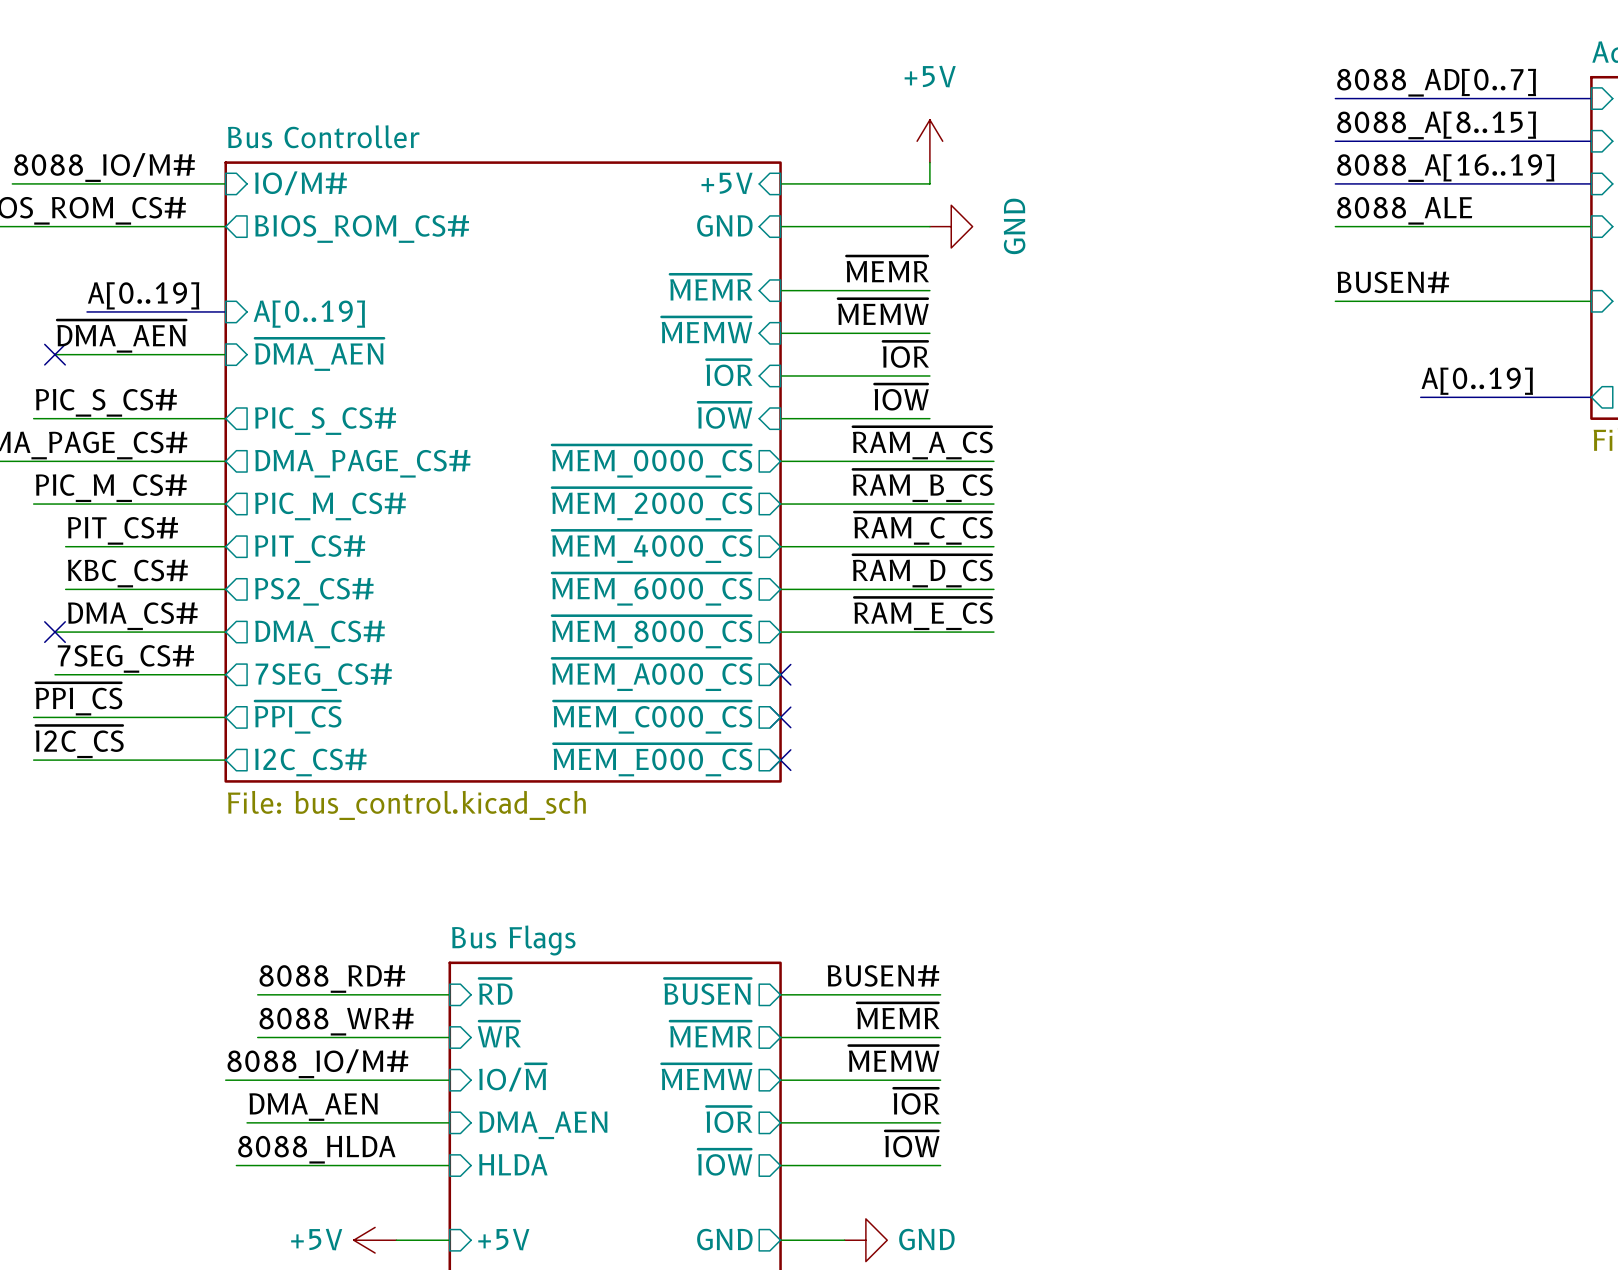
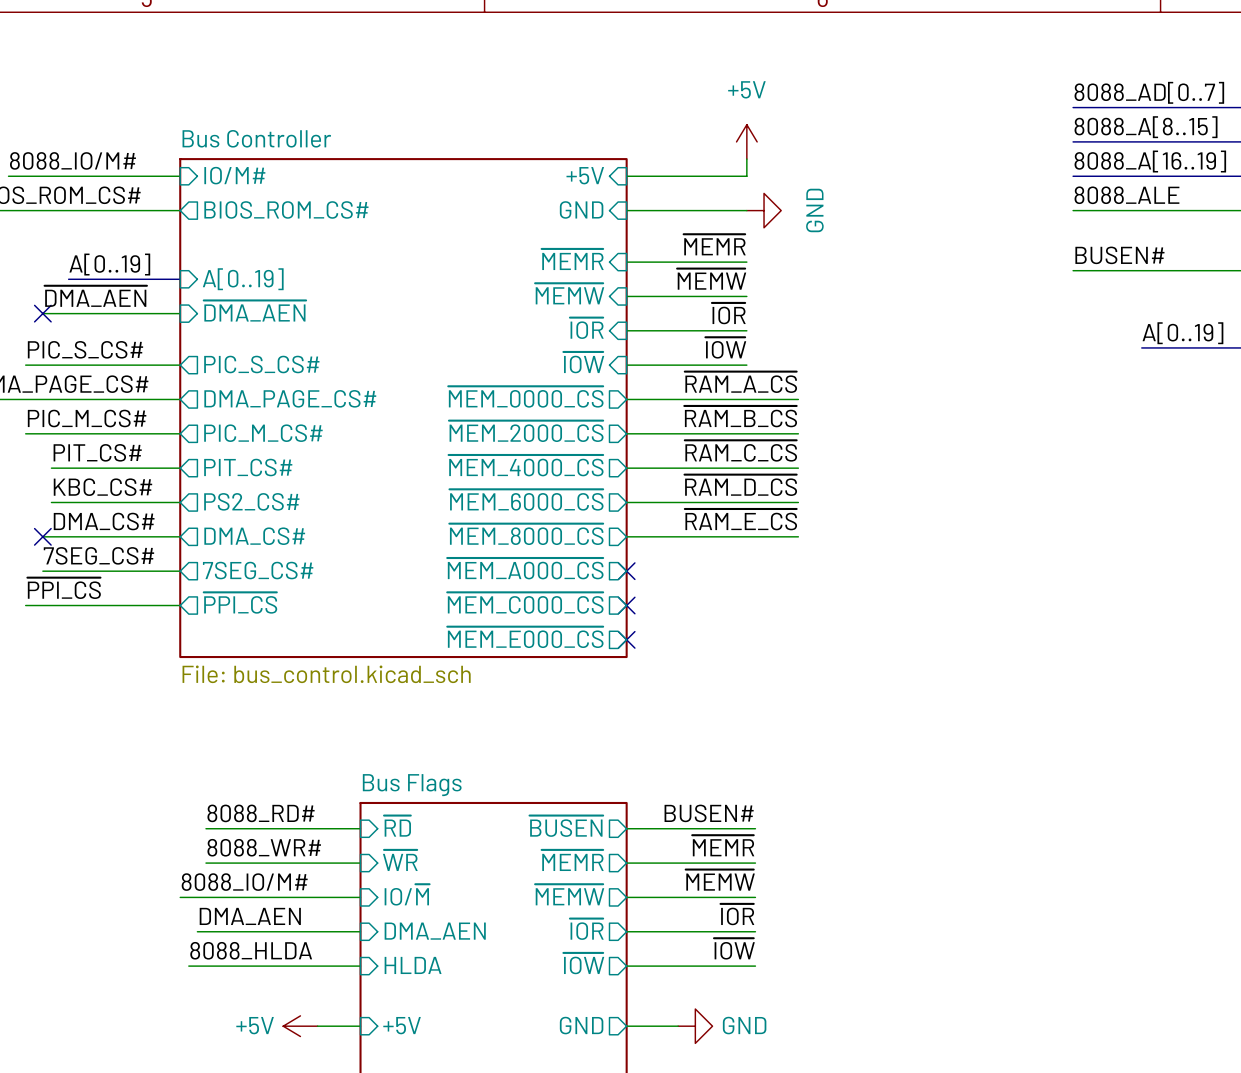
label: ~{I2C_CS} (79, 741) -> none
wire: (33, 760) (225, 760) -> none
sheet pin: I2C_CS# (310, 762) -> none

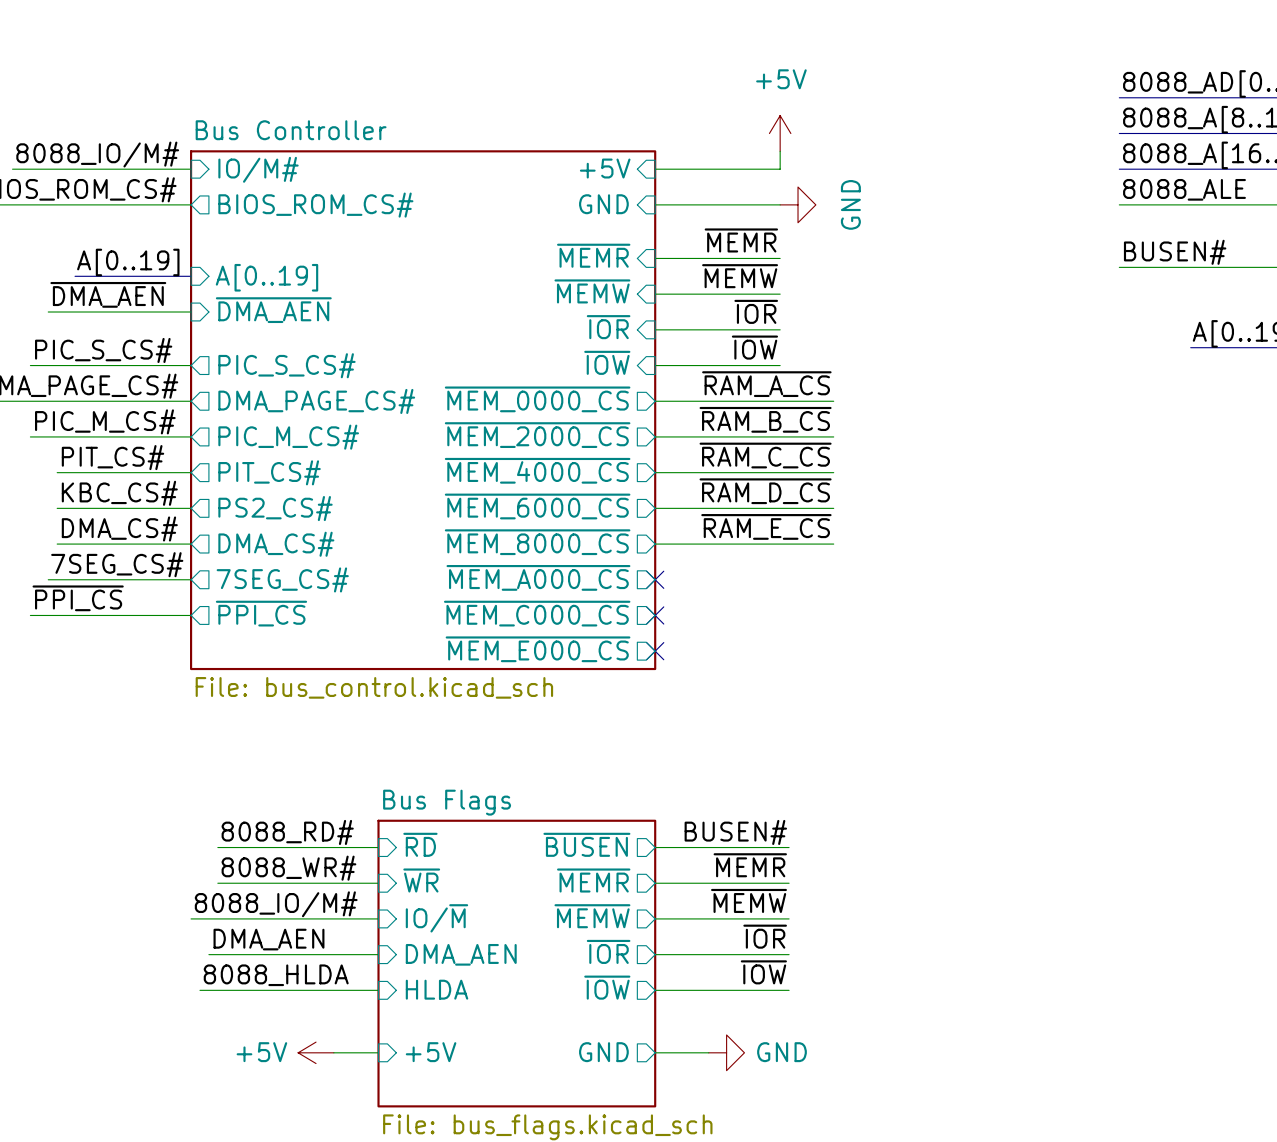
no-connect mark: (42, 313) -> none
wire: (42, 536) (51, 536) -> none
no-connect mark: (42, 536) -> none

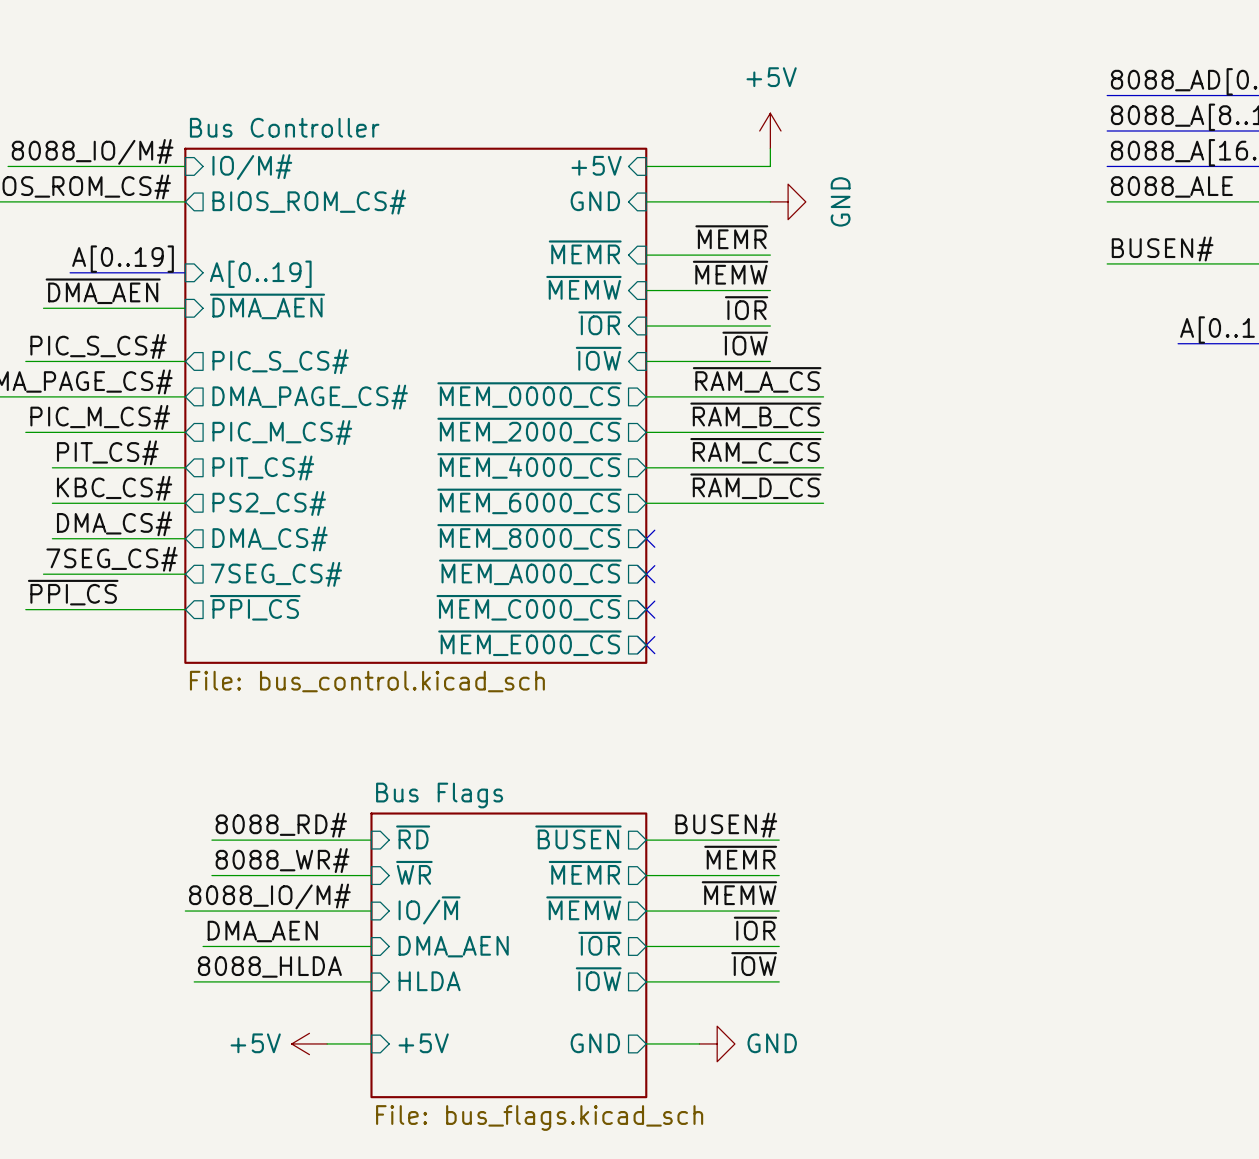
label: ~{RAM_E_CS} (766, 526) -> none
wire: (655, 544) (833, 544) -> none
no-connect mark: none -> (646, 538)

